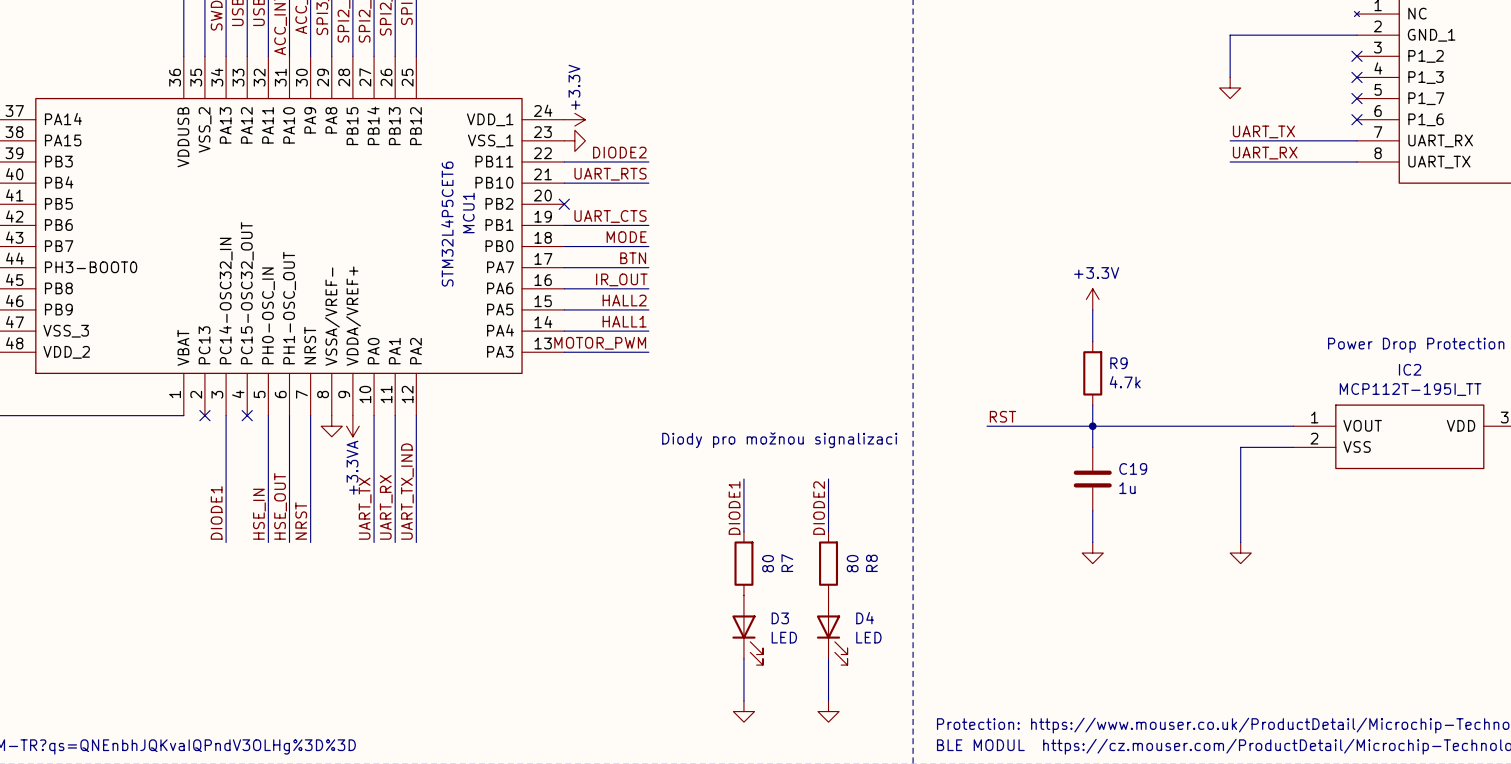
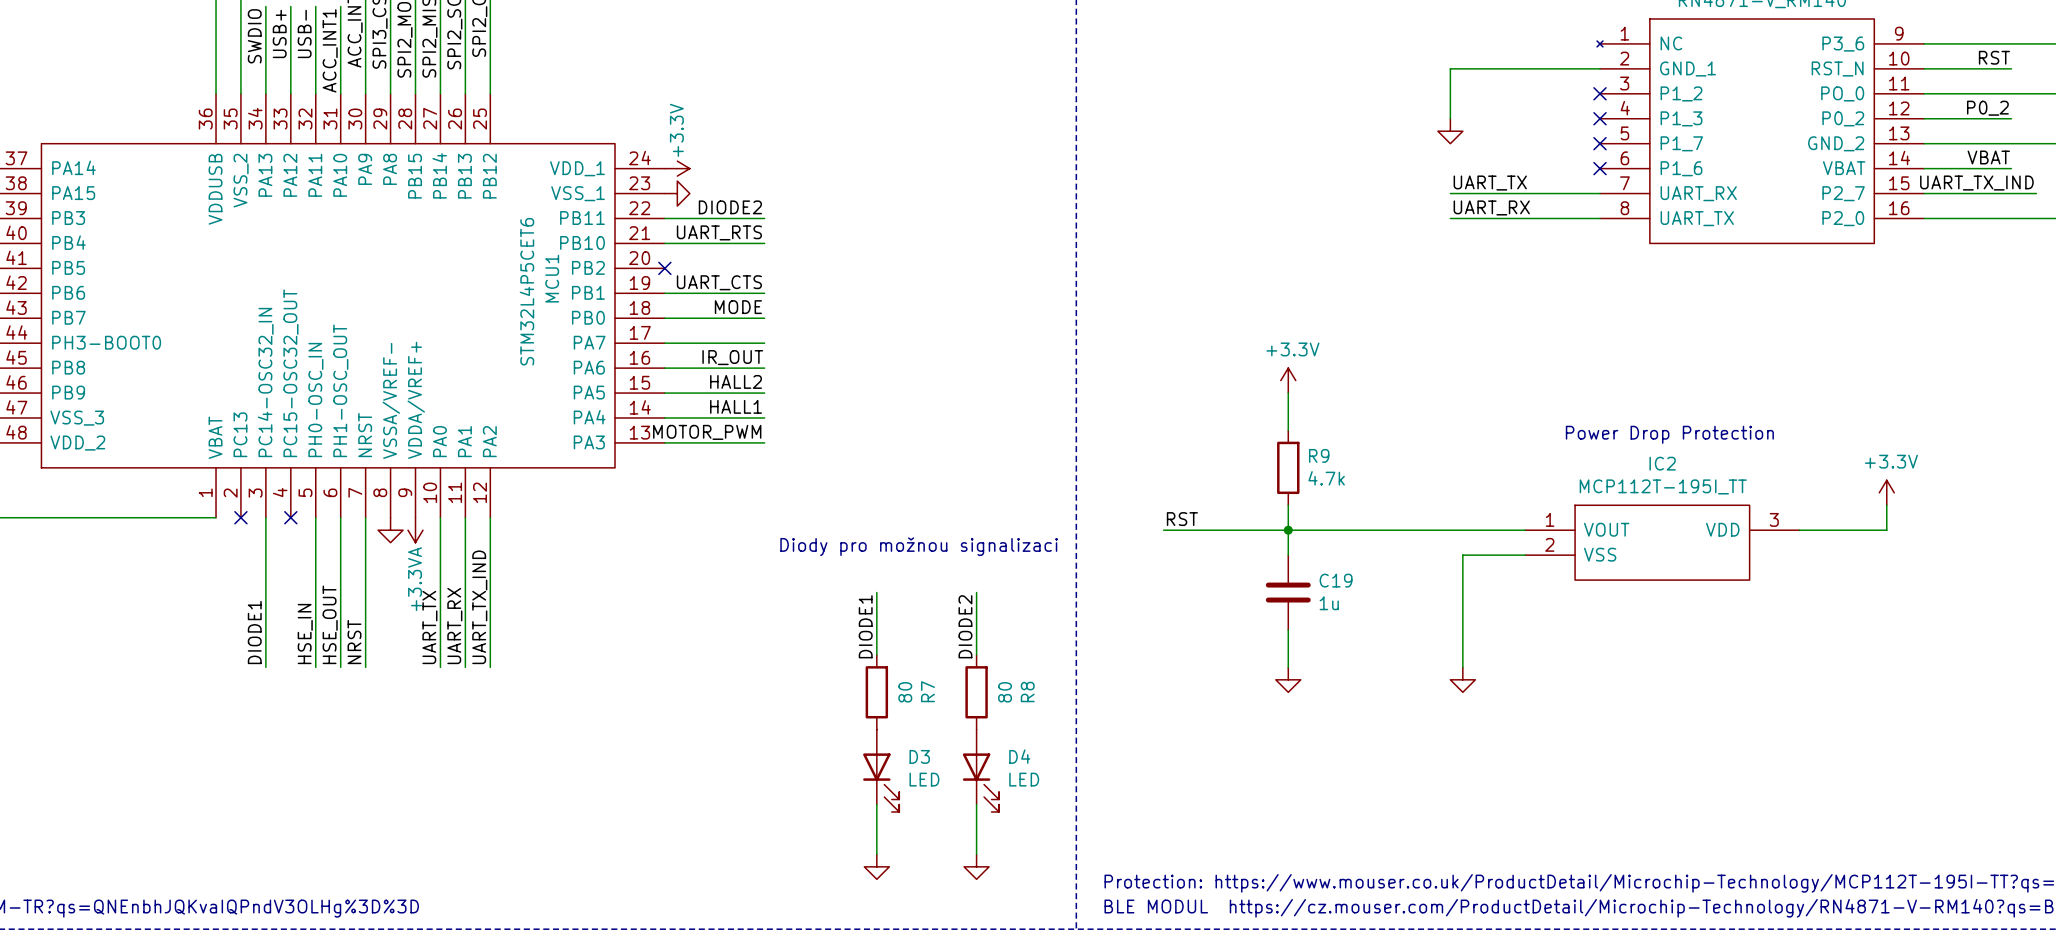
label: BTN (633, 258) -> none

